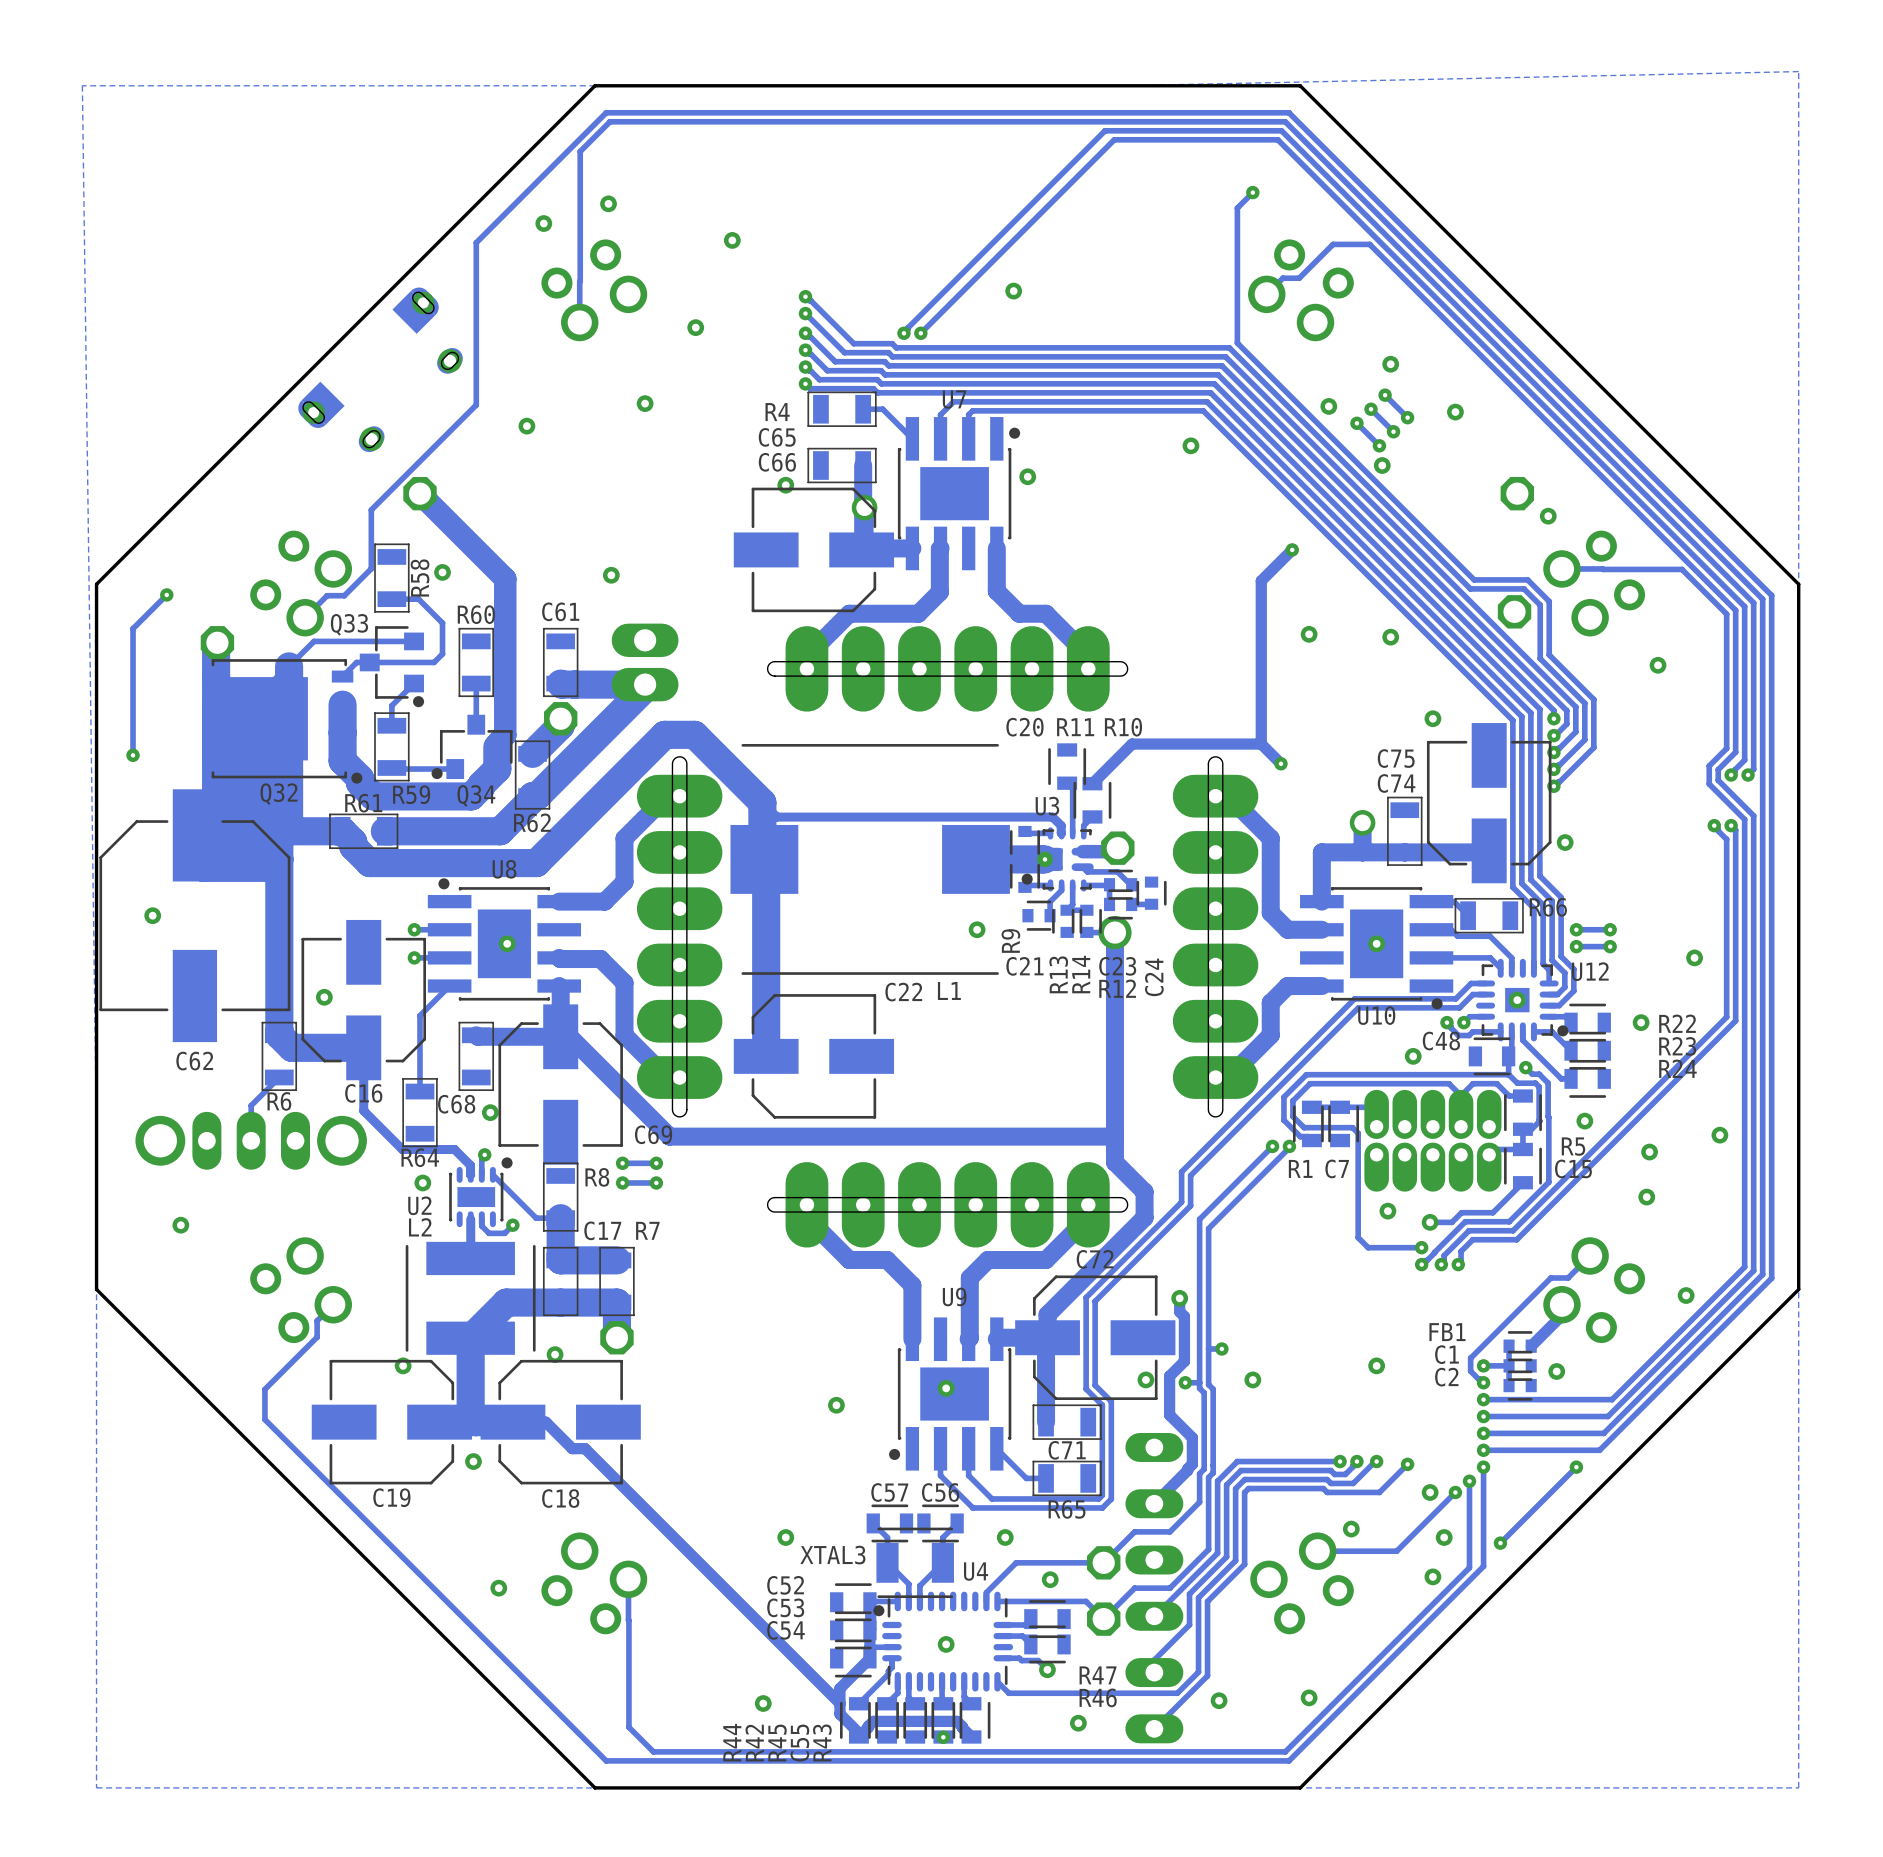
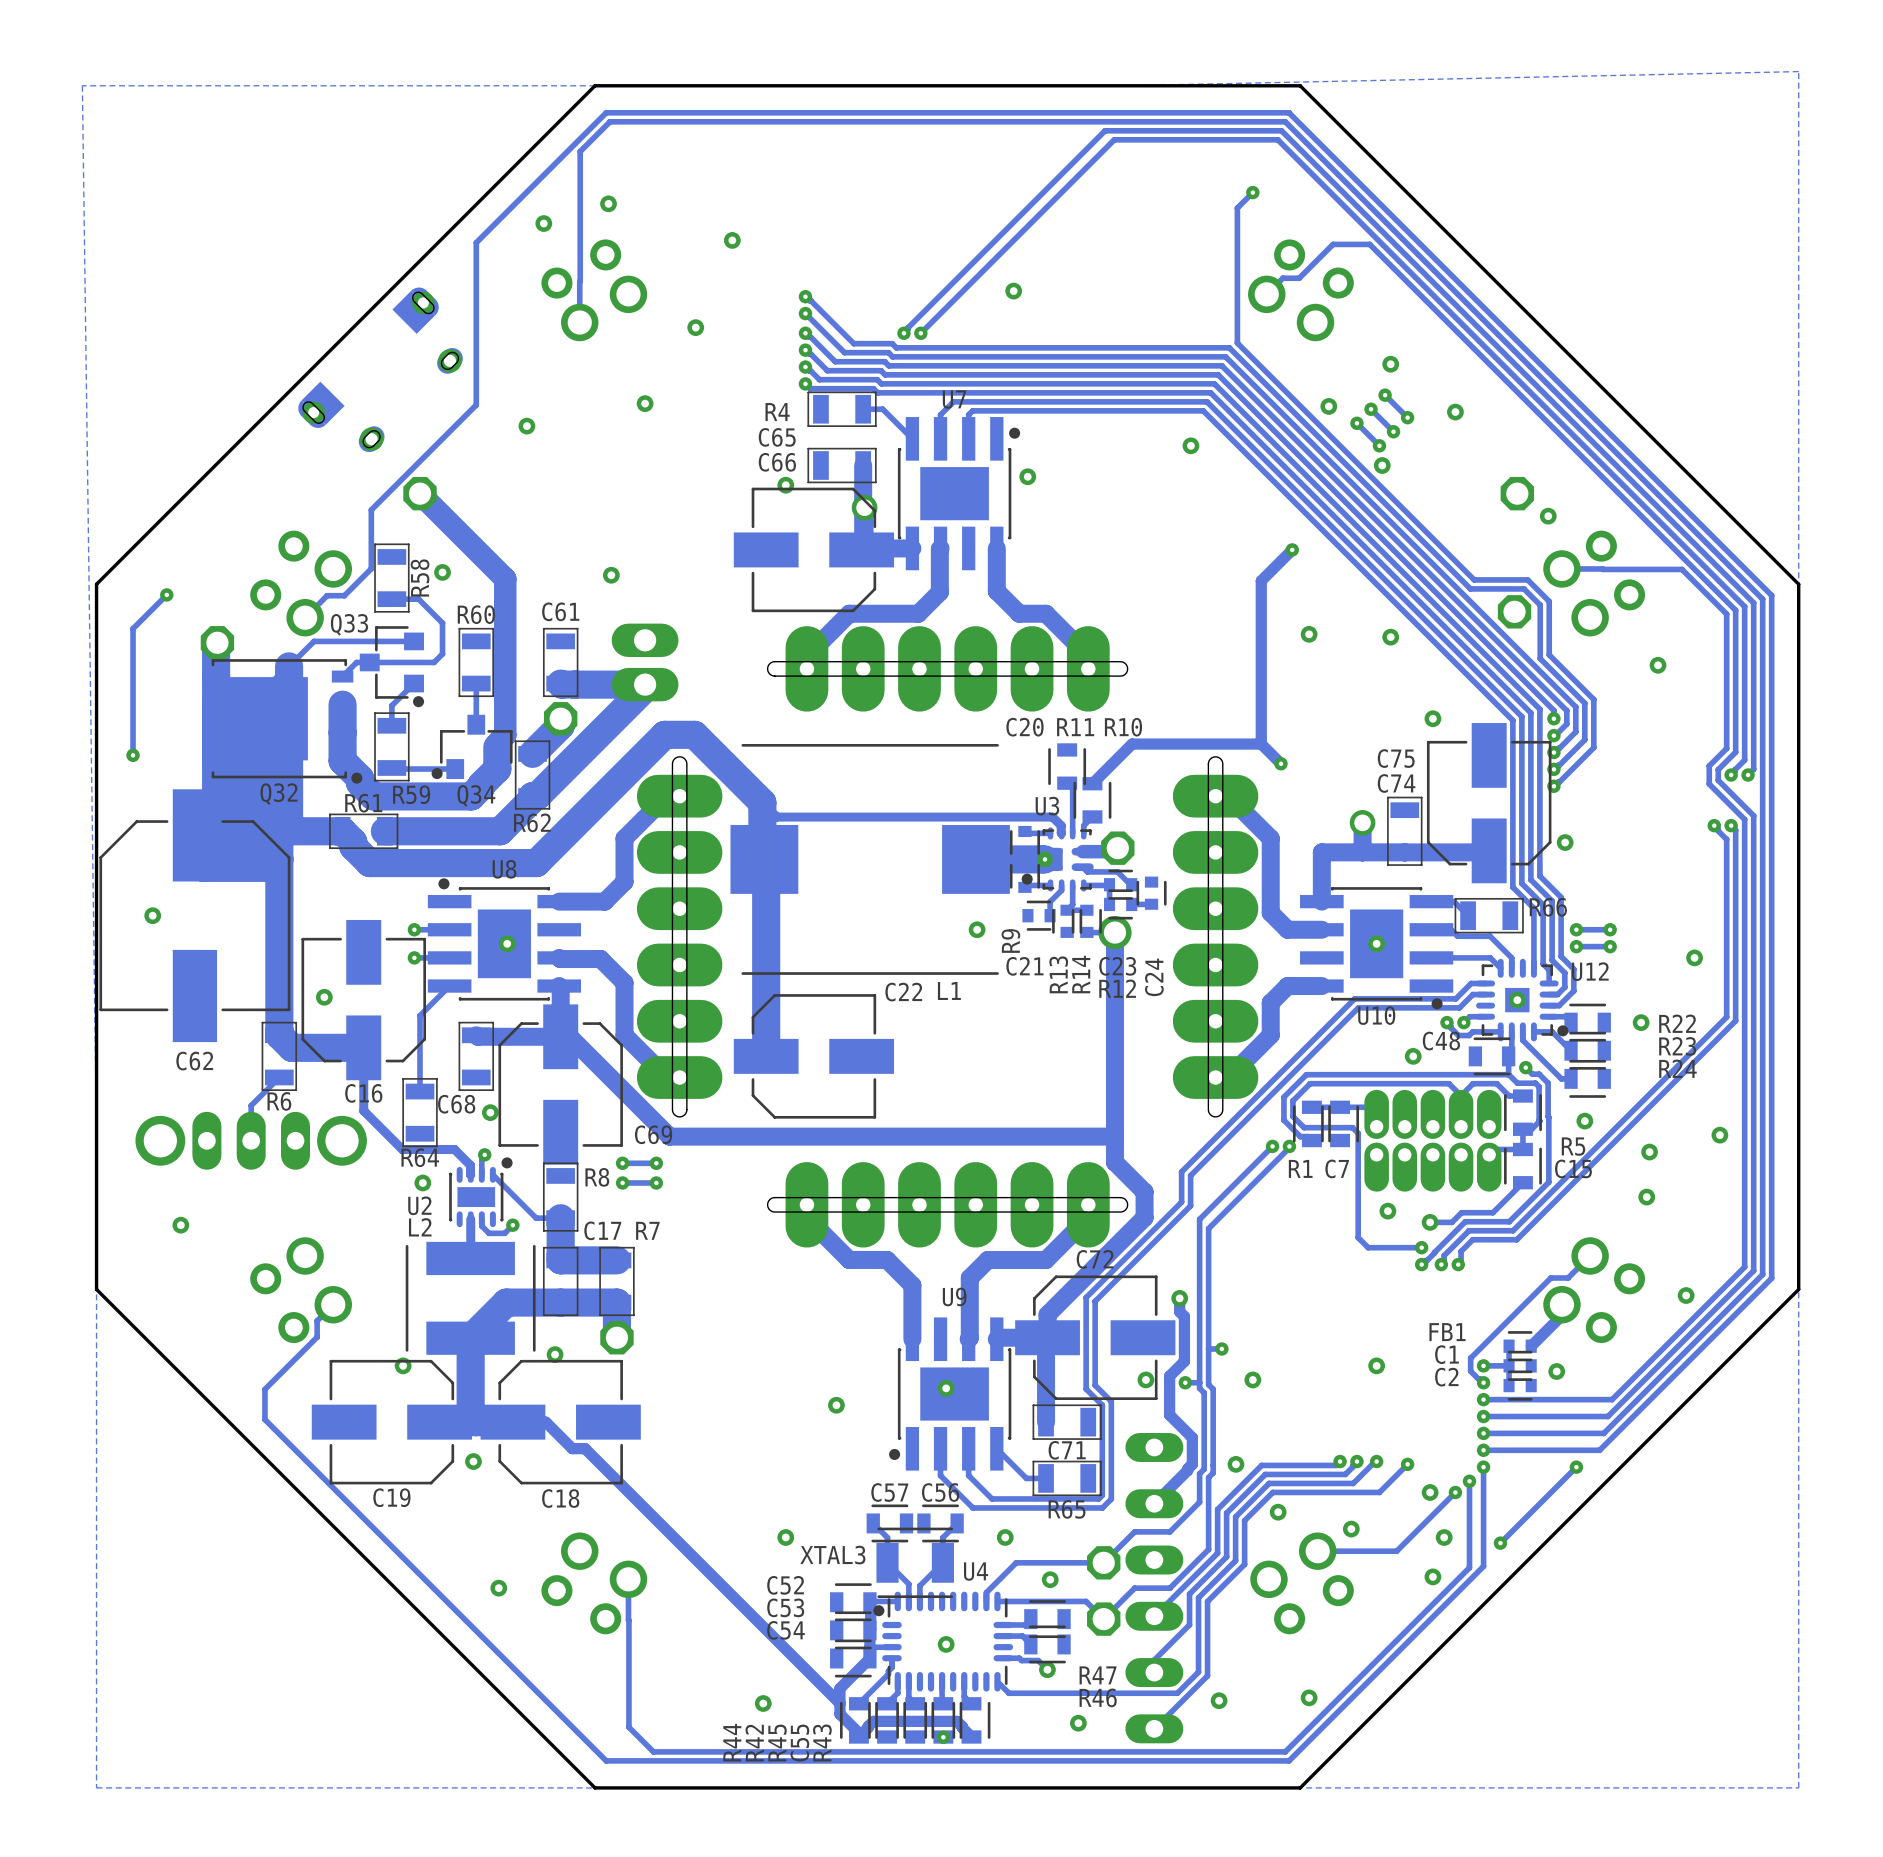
track: (1340, 1461) (1237, 1461) (1217, 1481) (1217, 1509) -> (1340, 1461) (1336, 1465) (1261, 1465) (1217, 1509)
via: none -> (1235, 1464)
track: (1334, 1474) (1330, 1470) (1241, 1470) (1226, 1484) (1226, 1513) -> (1334, 1474) (1265, 1474) (1226, 1513)
track: (1330, 1483) (1327, 1479) (1244, 1479) (1235, 1488) (1235, 1516) -> (1330, 1483) (1269, 1483) (1235, 1516)
track: (1327, 1492) (1323, 1488) (1248, 1488) (1244, 1492) (1244, 1520) -> (1327, 1492) (1272, 1492) (1244, 1520)
via: none -> (1278, 1512)

